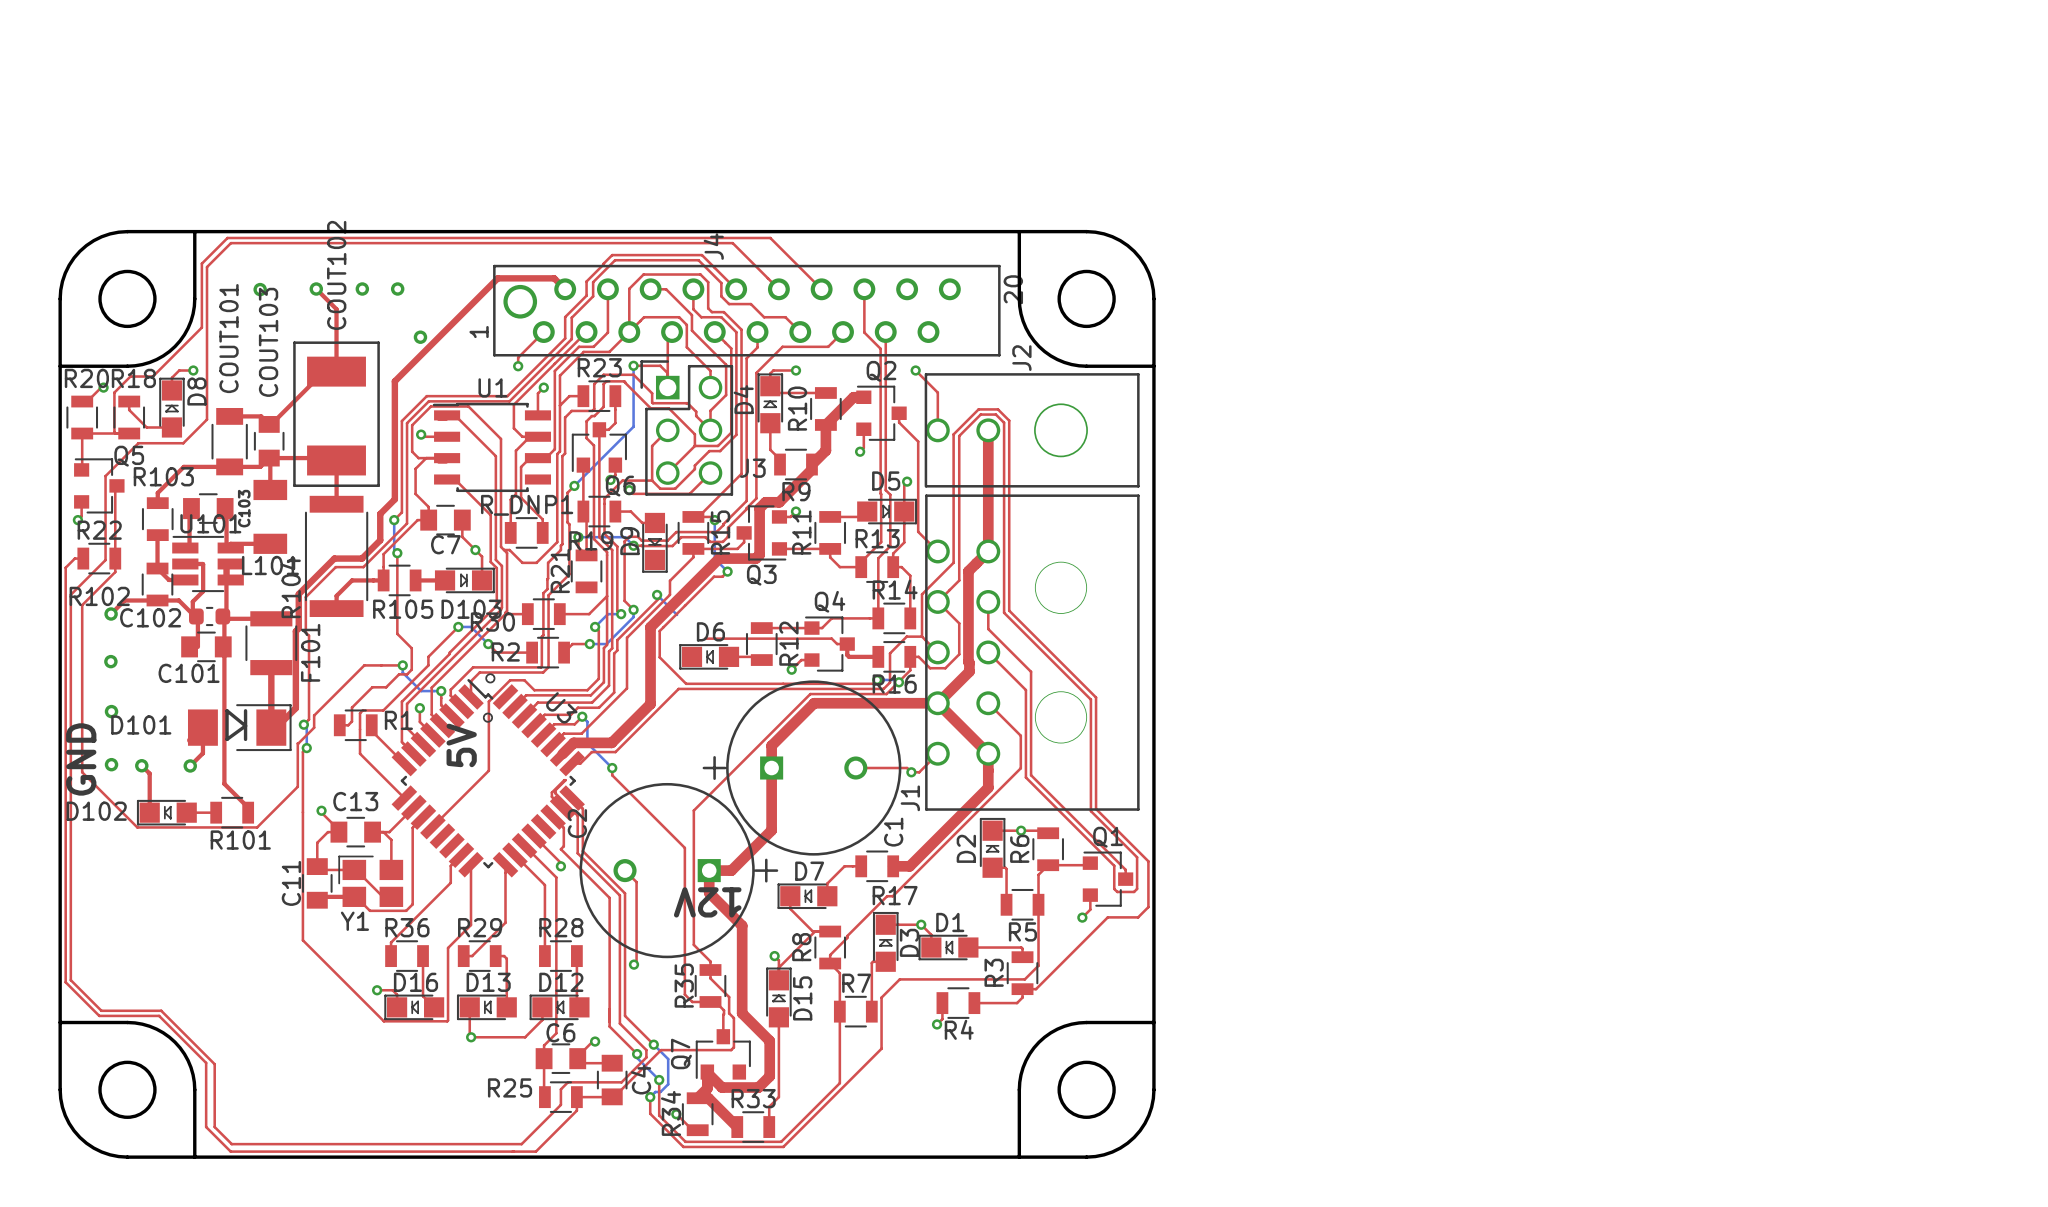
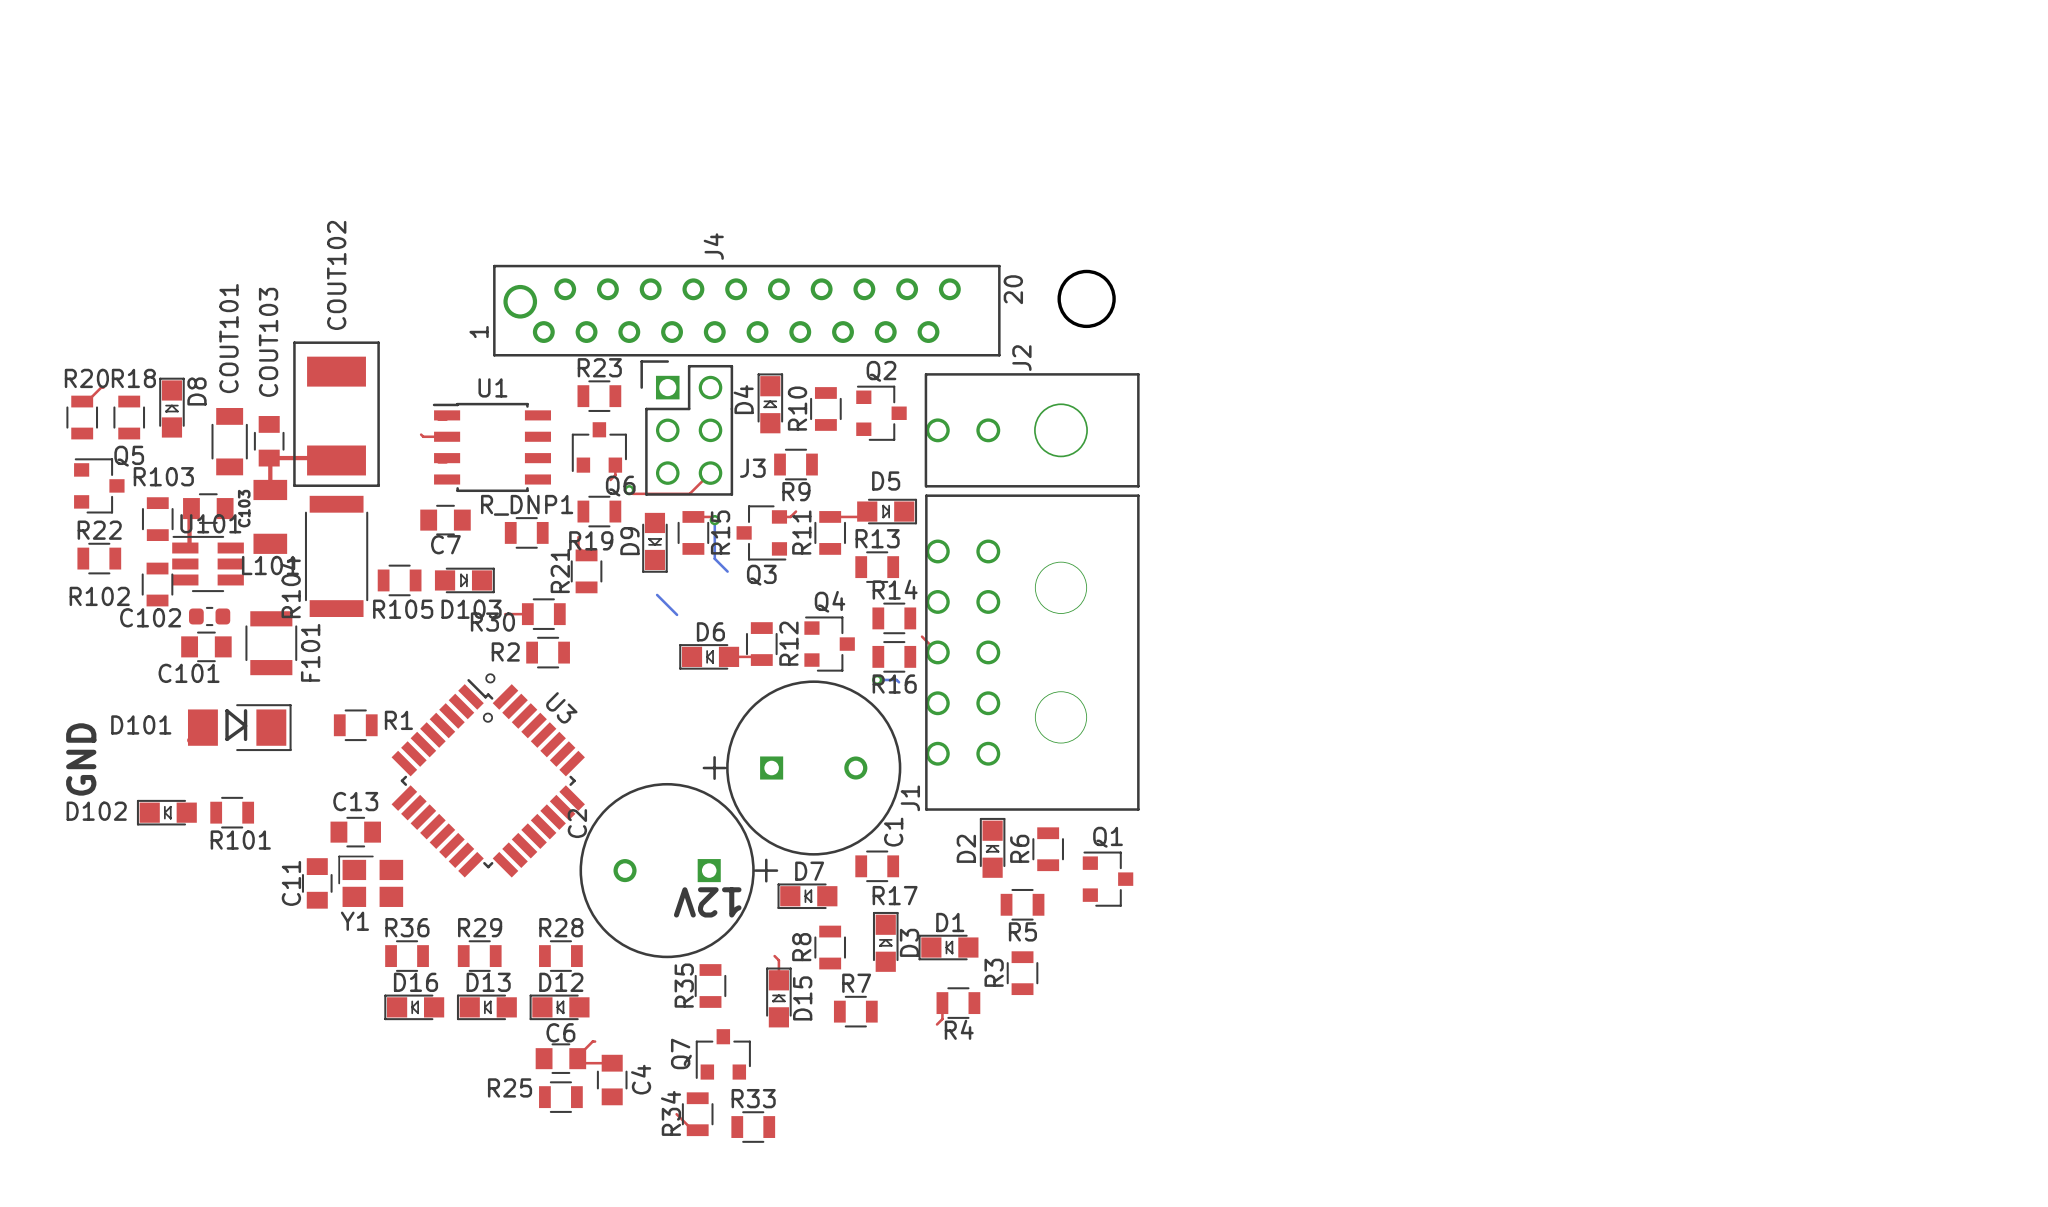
board edge: (127, 231) (1086, 231) (1112, 236) (1134, 251) (1148, 273) (1153, 298) (1153, 1089) (1148, 1115) (1134, 1137) (1112, 1152) (1086, 1157) (127, 1157) (101, 1152) (79, 1137) (65, 1115) (60, 1089) (60, 298) (65, 273) (79, 251) (101, 236) (127, 231) -> none
board edge: (194, 231) (193, 313) (184, 334) (175, 346) (163, 355) (142, 364) (60, 366) -> none
board edge: (1019, 231) (1021, 313) (1025, 328) (1039, 346) (1050, 355) (1071, 364) (1153, 366) -> none
round board edge: [98, 269, 157, 329] -> none
via: (260, 289) -> none
top track: (316, 289) (336, 309) (336, 371) (324, 371) (271, 424) (261, 416) (229, 416) -> none
via: (316, 289) -> none
via: (362, 289) -> none
via: (397, 289) -> none
top track: (565, 289) (554, 278) (497, 278) (394, 381) (394, 499) (380, 513) (380, 540) (362, 558) (334, 558) (298, 594) (298, 628) (295, 631) (295, 708) (276, 727) (271, 727) (271, 667) -> none
top track: (607, 289) (607, 332) (593, 346) (579, 346) (554, 371) (554, 449) (545, 458) (529, 458) (521, 467) (521, 497) (542, 519) (542, 532) -> none
top track: (650, 289) (666, 289) (691, 315) (691, 330) (726, 364) (726, 395) (710, 410) (710, 430) (696, 416) (696, 411) (687, 403) (652, 403) (652, 393) (633, 374) (603, 374) (594, 384) (594, 409) (592, 410) (571, 410) (565, 417) (565, 453) (562, 456) (562, 544) (560, 550) (548, 562) (547, 589) (543, 593) (541, 666) (473, 667) (450, 689) (450, 695) (461, 706) -> none
top track: (693, 289) (693, 309) (701, 317) (721, 317) (736, 332) (736, 434) (720, 451) (709, 451) (675, 488) (660, 488) (652, 480) -> none
top track: (736, 289) (701, 255) (612, 255) (586, 281) (586, 295) (565, 317) (565, 338) (507, 396) (426, 396) (401, 421) (401, 512) (394, 520) -> none
top track: (778, 289) (732, 243) (230, 243) (207, 267) (207, 419) (183, 443) (138, 443) (105, 476) (105, 560) (70, 594) (70, 980) (101, 1010) (161, 1010) (214, 1064) (214, 1127) (231, 1144) (521, 1144) (560, 1104) (560, 1089) (567, 1082) (621, 1082) (646, 1057) (646, 1050) (619, 1023) (619, 895) (577, 853) (577, 815) (555, 793) (555, 790) (565, 780) (551, 792) (551, 796) (562, 807) -> none
top track: (821, 289) (770, 238) (227, 238) (201, 263) (201, 327) (152, 376) (130, 376) (114, 392) (115, 433) -> none
top track: (864, 289) (864, 332) (880, 348) (881, 542) (861, 562) (861, 567) (839, 567) (830, 557) (830, 548) (779, 548) -> none
top track: (543, 332) (518, 357) (518, 366) -> none
top track: (586, 332) (513, 404) (513, 428) (522, 436) (537, 436) -> none
top track: (629, 332) (629, 288) (643, 274) (700, 274) (708, 282) (708, 308) (711, 312) (723, 312) (741, 329) (741, 473) (698, 516) -> none
top track: (672, 332) (667, 336) (667, 387) -> none
top track: (714, 332) (731, 348) (731, 432) (718, 445) (694, 445) -> none
top track: (757, 332) (757, 347) (746, 358) (746, 500) (716, 532) (676, 532) (667, 540) (641, 540) (637, 536) (629, 536) (624, 541) (624, 600) (633, 609) -> none
top track: (800, 332) (785, 317) (764, 317) (750, 304) (729, 304) (721, 296) (721, 283) (698, 260) (615, 260) (593, 282) (593, 296) (571, 317) (571, 339) (509, 401) (428, 401) (407, 423) (407, 523) (363, 567) (335, 567) (305, 597) (305, 632) (309, 635) (309, 719) (303, 724) -> none
top track: (843, 332) (828, 346) (782, 346) (756, 373) (756, 498) (728, 527) (728, 536) (722, 541) (710, 541) (705, 537) (681, 537) (672, 546) (633, 545) -> none
top track: (885, 332) (885, 490) (890, 494) (890, 546) (878, 558) (878, 618) (831, 618) (822, 628) (761, 628) -> none
via: (420, 337) -> none
top track: (633, 365) (660, 365) (667, 373) -> none
bottom track: (633, 365) (633, 426) (574, 485) -> none
via: (633, 365) -> none
via: (518, 366) -> none
top track: (193, 370) (179, 370) (171, 377) (171, 390) -> none
via: (193, 370) -> none
top track: (795, 370) (773, 370) (770, 373) (770, 386) (777, 392) (825, 392) -> none
via: (795, 370) -> none
top track: (915, 370) (937, 392) (937, 430) -> none
via: (915, 370) -> none
via: (103, 387) -> none
top track: (543, 387) (537, 393) (537, 415) -> none
via: (543, 387) -> none
top track: (710, 387) (710, 370) (686, 347) (686, 324) (679, 317) (644, 317) (609, 351) (583, 351) (559, 375) (557, 542) (536, 562) (522, 562) (509, 550) (504, 550) -> none
top track: (583, 396) (569, 396) (559, 405) -> none
top track: (615, 396) (615, 423) (608, 429) (599, 429) (599, 537) (612, 550) (612, 648) (609, 651) (609, 685) (592, 702) (537, 702) (524, 715) -> none
top track: (863, 397) (853, 397) (825, 424) (825, 450) (811, 464) (811, 469) -> none
top track: (129, 401) (129, 409) (146, 427) (171, 427) -> none
top track: (899, 413) (899, 422) (918, 441) (918, 531) (937, 551) -> none
top track: (439, 415) (455, 415) (495, 456) (495, 559) (501, 565) (501, 607) (407, 703) (407, 728) (423, 744) -> none
top track: (770, 423) (770, 449) (780, 459) (780, 464) -> none
top track: (863, 429) (863, 448) (860, 451) -> none
top track: (667, 430) (652, 445) (652, 480) -> none
top track: (988, 430) (988, 551) (968, 571) (969, 671) (937, 703) -> none
top track: (129, 433) (82, 433) (81, 469) -> none
via: (421, 434) -> none
top track: (529, 436) (515, 450) (515, 494) (510, 499) (510, 532) -> none
top track: (694, 445) (694, 434) (668, 408) (650, 408) (624, 381) (606, 381) (603, 384) (603, 406) (586, 421) (586, 438) (593, 445) (593, 539) (607, 552) (607, 644) (603, 648) (603, 682) (590, 695) (526, 695) (515, 706) -> none
top track: (694, 445) (667, 473) -> none
via: (860, 451) -> none
top track: (269, 458) (260, 466) (183, 466) (157, 492) (157, 503) (152, 503) -> none
top track: (426, 458) (415, 468) (415, 493) (428, 507) (428, 520) (417, 520) (383, 554) (383, 580) (352, 580) (336, 595) (336, 608) -> none
top track: (447, 458) (418, 458) (412, 451) (412, 425) (430, 406) (468, 406) (500, 438) (500, 546) (507, 553) (507, 611) (431, 687) (431, 714) (442, 725) -> none
top track: (336, 460) (336, 504) -> none
top track: (583, 465) (583, 515) (586, 518) -> none
top track: (811, 469) (779, 502) (765, 502) (759, 508) (759, 554) (755, 558) (719, 558) (650, 627) (650, 704) (611, 742) (573, 742) (562, 754) -> none
top track: (447, 479) (455, 479) (490, 515) (490, 562) (496, 568) (496, 605) (401, 701) (401, 742) (413, 754) -> none
via: (610, 479) -> none
top track: (652, 480) (622, 480) (604, 498) (604, 533) (617, 546) (617, 610) (621, 614) -> none
top track: (907, 481) (904, 484) (904, 542) (893, 553) (893, 567) (901, 567) (910, 575) (910, 618) -> none
via: (907, 481) -> none
top track: (116, 485) (115, 487) (115, 572) (82, 605) (82, 772) (137, 827) (257, 827) (297, 786) (297, 743) (314, 727) (314, 715) (364, 665) (402, 665) -> none
top track: (574, 485) (567, 492) (569, 574) (548, 595) (548, 667) (543, 672) (479, 672) (470, 681) (470, 696) -> none
via: (574, 485) -> none
top track: (81, 501) (81, 516) (77, 520) -> none
top track: (225, 508) (226, 548) (230, 543) (270, 543) (266, 548) -> none
top track: (583, 511) (586, 514) (586, 559) -> none
top track: (615, 511) (630, 511) (642, 522) (654, 522) -> none
via: (795, 511) -> none
via: (77, 520) -> none
bottom track: (394, 520) (394, 550) (397, 553) -> none
via: (394, 520) -> none
top track: (462, 520) (462, 536) (482, 556) (482, 580) -> none
top track: (744, 532) (744, 542) (737, 548) (693, 548) (693, 557) (669, 580) (669, 594) (627, 637) (627, 688) (581, 733) (563, 733) (553, 744) -> none
top track: (157, 535) (157, 568) (168, 579) (189, 579) -> none
bottom track: (578, 537) (625, 537) (633, 545) -> none
via: (578, 537) -> none
via: (633, 545) -> none
via: (475, 550) -> none
top track: (397, 553) (397, 633) (411, 648) (411, 669) (407, 674) (399, 674) (386, 687) (372, 687) (351, 707) (351, 721) (348, 725) (339, 725) -> none
via: (397, 553) -> none
top track: (83, 558) (74, 558) (65, 567) (65, 982) (99, 1015) (159, 1015) (206, 1062) (206, 1127) (230, 1151) (535, 1151) (576, 1110) (576, 1097) (614, 1096) (661, 1050) (731, 1050) (733, 1047) (733, 1018) (729, 1013) (729, 997) (710, 978) (710, 961) (693, 944) (693, 810) (810, 694) (886, 694) (910, 670) (910, 656) (918, 656) (930, 668) (945, 668) (959, 654) (959, 623) (937, 601) (959, 580) (959, 436) (980, 414) (995, 414) (1004, 422) (1004, 612) (1090, 699) (1090, 811) (1137, 857) (1137, 888) (1134, 891) (1117, 891) (1114, 888) (1114, 865) (1025, 777) (1025, 690) (988, 652) -> none
top track: (189, 564) (203, 564) (203, 591) (192, 601) (192, 616) (197, 621) (197, 646) -> none
top track: (226, 564) (226, 616) -> none
top track: (727, 571) (722, 576) (714, 576) (659, 631) (659, 657) (686, 683) (873, 683) (877, 679) -> none
via: (727, 571) -> none
top track: (415, 580) (445, 580) -> none
top track: (657, 594) (659, 598) (617, 640) (617, 650) (614, 653) (614, 692) (599, 707) (577, 707) (570, 714) (544, 714) (534, 725) -> none
via: (657, 594) -> none
top track: (607, 596) (589, 614) (559, 614) -> none
top track: (988, 601) (988, 629) (1031, 671) (1031, 775) (1125, 869) (1125, 879) -> none
bottom track: (633, 609) (633, 617) (606, 644) (589, 644) -> none
via: (633, 609) -> none
top track: (111, 614) (124, 600) (178, 600) (192, 614) -> none
via: (111, 614) -> none
bottom track: (621, 614) (607, 614) (595, 626) -> none
via: (621, 614) -> none
top track: (226, 616) (224, 618) (224, 783) (248, 807) -> none
top track: (226, 616) (228, 618) (271, 618) -> none
top track: (458, 626) (428, 656) (428, 665) (383, 710) (362, 710) (360, 713) (360, 753) (404, 798) -> none
bottom track: (458, 626) (471, 626) (488, 644) -> none
via: (458, 626) -> none
top track: (595, 626) (598, 630) (598, 678) (587, 690) (534, 690) (524, 680) (510, 680) (488, 701) (488, 770) (432, 826) -> none
via: (595, 626) -> none
top track: (705, 638) (831, 638) (837, 644) (847, 644) (847, 655) (849, 656) (878, 656) -> none
top track: (488, 644) (496, 652) (532, 652) -> none
via: (488, 644) -> none
top track: (589, 644) (572, 644) (564, 652) -> none
via: (589, 644) -> none
top track: (811, 660) (801, 660) (791, 669) -> none
via: (110, 661) -> none
bottom track: (402, 665) (402, 672) (421, 691) (441, 691) -> none
via: (402, 665) -> none
via: (791, 669) -> none
via: (899, 682) -> none
top track: (441, 691) (441, 705) (451, 715) -> none
via: (441, 691) -> none
top track: (937, 703) (988, 753) (988, 787) (909, 866) (893, 866) -> none
top track: (937, 703) (814, 703) (771, 745) (771, 830) (731, 870) (709, 870) (709, 892) (742, 925) (742, 1013) (769, 1040) (769, 1076) (758, 1087) (721, 1087) (707, 1072) -> none
top track: (988, 703) (1020, 735) (1020, 768) (892, 896) (887, 896) (830, 955) (830, 963) (839, 973) (839, 1083) (781, 1141) (685, 1141) (659, 1115) (659, 1080) -> none
top track: (419, 708) (419, 721) (432, 735) -> none
via: (419, 708) -> none
via: (111, 711) -> none
top track: (582, 716) (574, 724) (554, 724) (543, 735) -> none
bottom track: (582, 716) (587, 721) (587, 743) (612, 768) -> none
via: (582, 716) -> none
bottom track: (303, 724) (306, 727) (306, 748) -> none
via: (303, 724) -> none
top track: (371, 725) (371, 730) (404, 763) -> none
top track: (202, 730) (202, 727) (202, 753) (190, 765) -> none
text: 5V (461, 745) -> none
top track: (306, 748) (302, 751) (302, 940) (383, 1021) (448, 1020) (448, 947) (470, 925) (470, 864) -> none
via: (306, 748) -> none
top track: (937, 753) (919, 772) (911, 772) (907, 768) (855, 768) -> none
top track: (572, 763) (580, 763) (591, 752) (615, 752) (678, 688) (883, 688) (890, 682) (890, 653) (906, 636) (922, 636) (922, 594) (953, 562) (953, 434) (978, 409) (998, 409) (1009, 420) (1009, 610) (1096, 697) (1096, 809) (1148, 861) (1148, 907) (1138, 917) (1107, 917) (1036, 989) (1022, 989) (1022, 997) (1017, 1003) (974, 1003) -> none
via: (111, 764) -> none
top track: (140, 764) (149, 773) (149, 812) -> none
via: (141, 765) -> none
via: (190, 765) -> none
top track: (612, 768) (612, 775) (684, 847) (684, 994) (692, 1001) (715, 1001) (724, 1010) (723, 1036) -> none
via: (612, 768) -> none
via: (911, 772) -> none
top track: (572, 798) (582, 808) (582, 851) (625, 893) (625, 1015) (653, 1044) -> none
top track: (413, 807) (389, 832) (372, 832) -> none
top track: (321, 810) (338, 832) (327, 832) (317, 842) (317, 866) (320, 869) (356, 869) (382, 896) (391, 896) -> none
via: (321, 810) -> none
top track: (186, 812) (216, 812) -> none
top track: (423, 817) (412, 827) (412, 904) (406, 910) (369, 910) (356, 896) (320, 896) (317, 900) -> none
top track: (553, 817) (563, 827) (563, 846) (560, 849) (609, 897) (609, 1026) (637, 1054) -> none
top track: (992, 830) (1045, 830) (1048, 833) -> none
via: (1021, 830) -> none
top track: (383, 832) (391, 839) (391, 869) (393, 869) -> none
top track: (534, 836) (560, 863) (560, 866) -> none
top track: (524, 845) (556, 877) (556, 1033) (544, 1045) (544, 1097) -> none
top track: (461, 855) (450, 865) (450, 882) (391, 942) (391, 956) -> none
top track: (515, 855) (544, 885) (544, 956) -> none
top track: (1090, 863) (1088, 865) (1048, 865) (1038, 874) (1038, 965) (1024, 979) (899, 979) (881, 997) (881, 1048) (783, 1146) (683, 1146) (650, 1113) (650, 1097) -> none
top track: (505, 864) (505, 922) (472, 956) (463, 956) -> none
via: (560, 866) -> none
top track: (861, 866) (844, 866) (827, 883) (827, 896) -> none
top track: (992, 867) (1006, 869) (1006, 904) -> none
top track: (625, 870) (636, 882) (636, 962) (634, 964) -> none
top track: (1090, 895) (1090, 909) (1082, 917) -> none
top track: (790, 896) (790, 908) (812, 931) (830, 931) -> none
via: (1082, 917) -> none
top track: (885, 924) (921, 924) (931, 934) (931, 947) -> none
via: (921, 924) -> none
top track: (815, 931) (778, 967) -> none
top track: (968, 947) (1021, 947) (1022, 957) -> none
top track: (423, 956) (423, 996) (434, 1007) -> none
top track: (495, 956) (504, 956) (506, 958) (506, 1007) -> none
top track: (576, 956) (576, 1004) (579, 1007) -> none
via: (774, 956) -> none
top track: (885, 961) (871, 963) (871, 1011) -> none
via: (634, 964) -> none
top track: (377, 990) (392, 990) (397, 994) (397, 1007) -> none
via: (377, 990) -> none
top track: (469, 1007) (471, 1037) (525, 1037) (542, 1020) (542, 1007) -> none
top track: (778, 1017) (778, 1097) (769, 1106) (769, 1127) -> none
board edge: (60, 1022) (142, 1024) (163, 1032) (175, 1042) (188, 1060) (193, 1074) (194, 1157) -> none
board edge: (1153, 1022) (1071, 1024) (1057, 1029) (1039, 1042) (1025, 1060) (1021, 1074) (1019, 1157) -> none
via: (937, 1024) -> none
via: (471, 1037) -> none
via: (595, 1041) -> none
bottom track: (653, 1044) (668, 1059) (668, 1084) (660, 1091) (655, 1091) (650, 1097) -> none
via: (653, 1044) -> none
bottom track: (637, 1054) (637, 1057) (659, 1080) -> none
via: (637, 1054) -> none
round board edge: [98, 1060, 157, 1119] -> none
round board edge: [1057, 1060, 1116, 1119] -> none
top track: (707, 1072) (707, 1088) (697, 1098) (708, 1098) (737, 1127) -> none
via: (659, 1080) -> none
via: (650, 1097) -> none
via: (676, 1114) -> none

